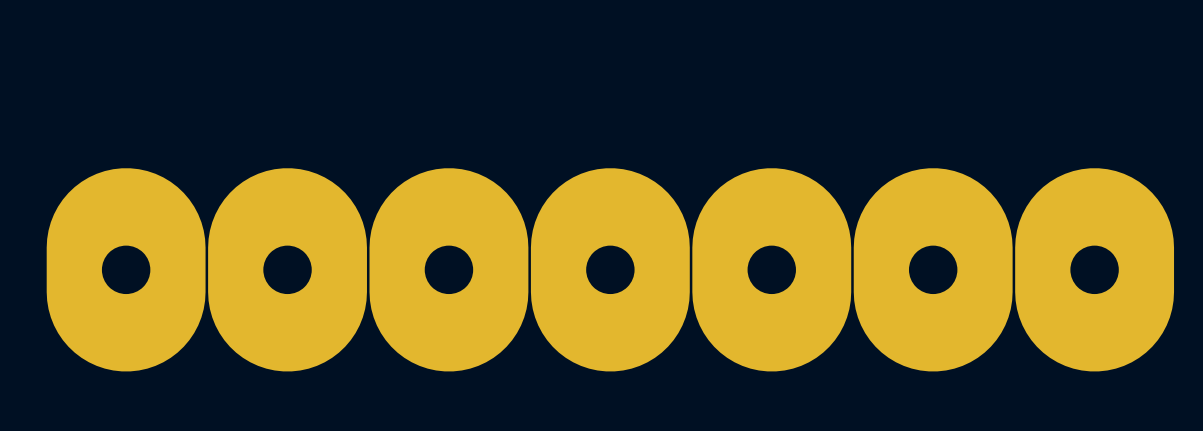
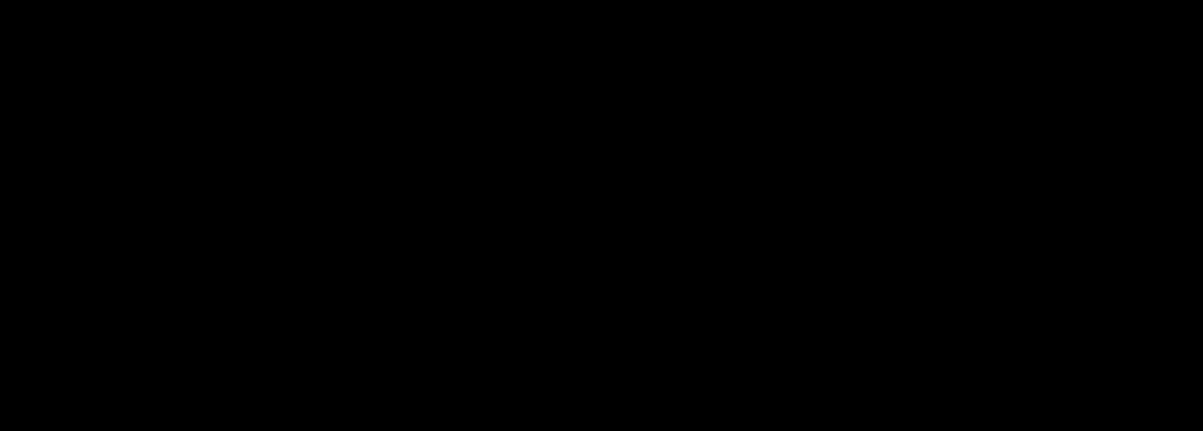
part: (610, 269) -> none

